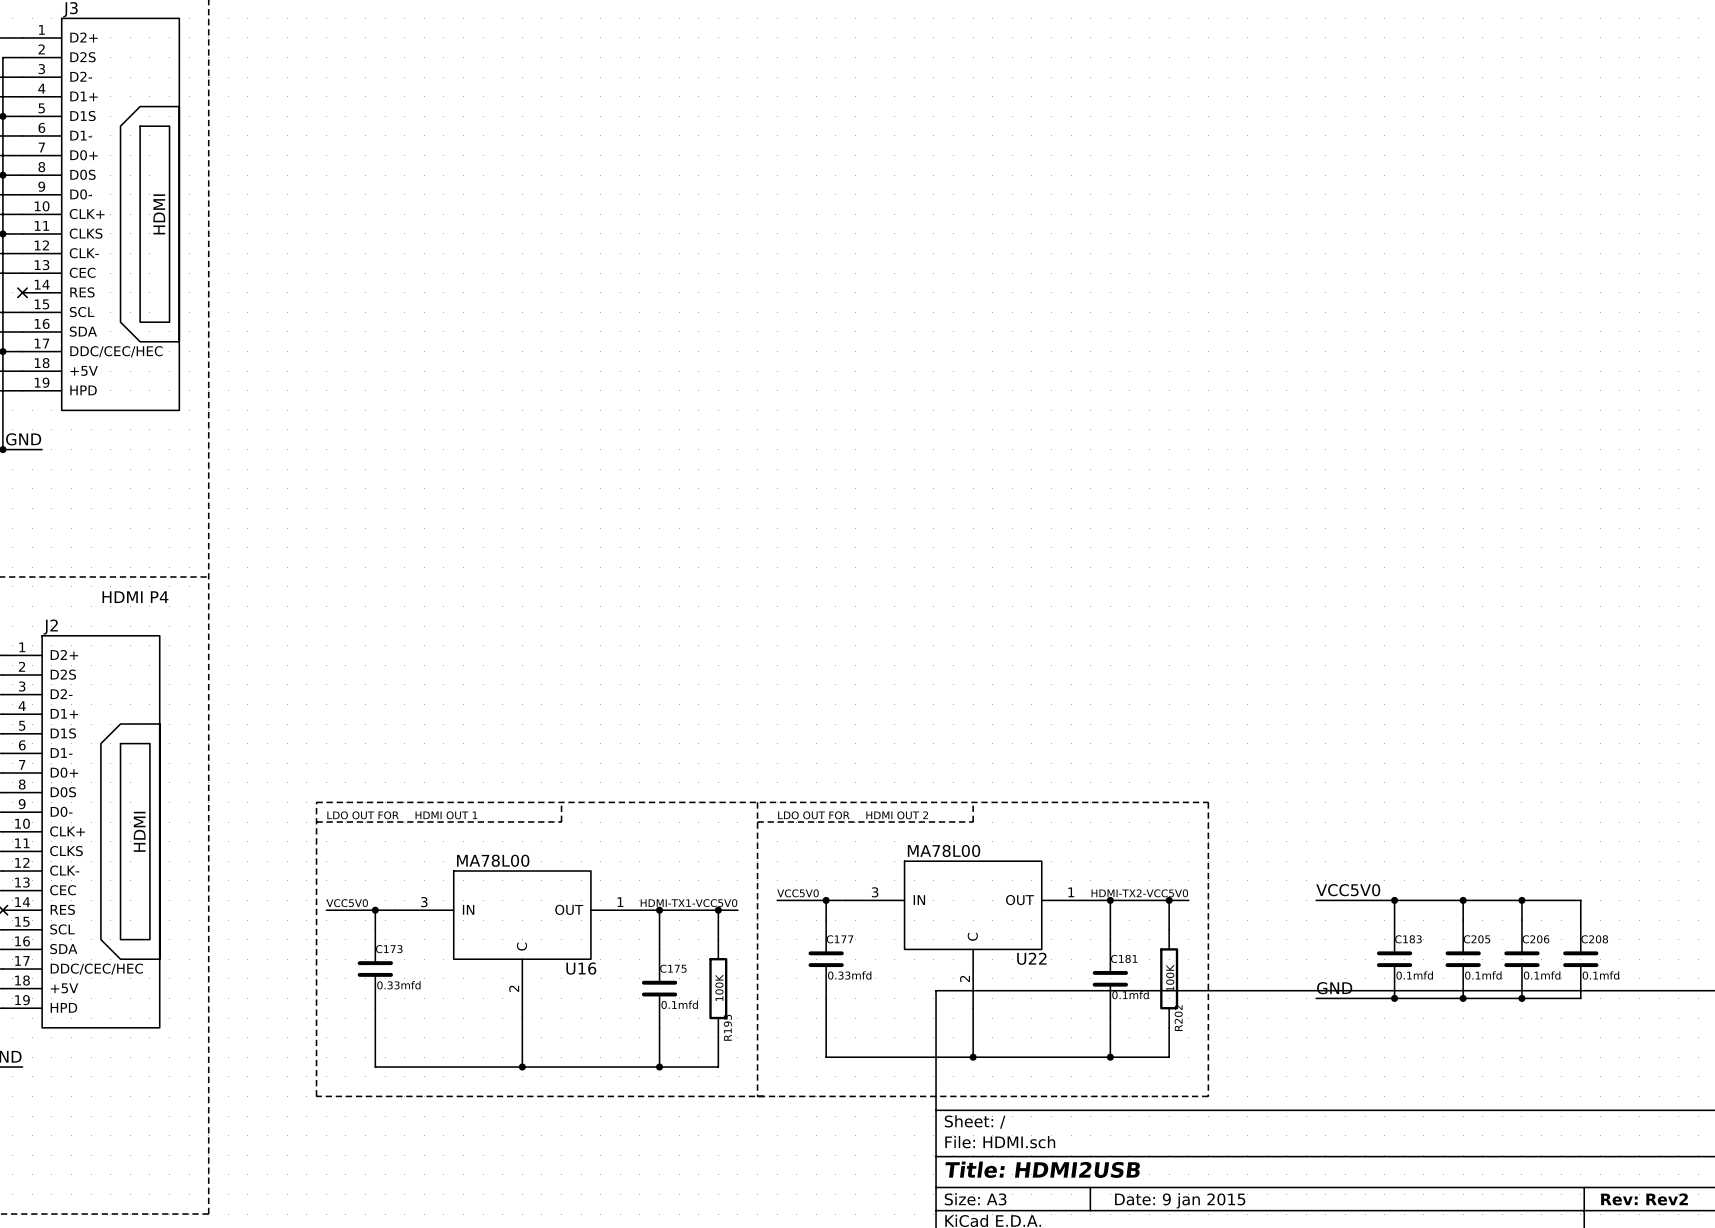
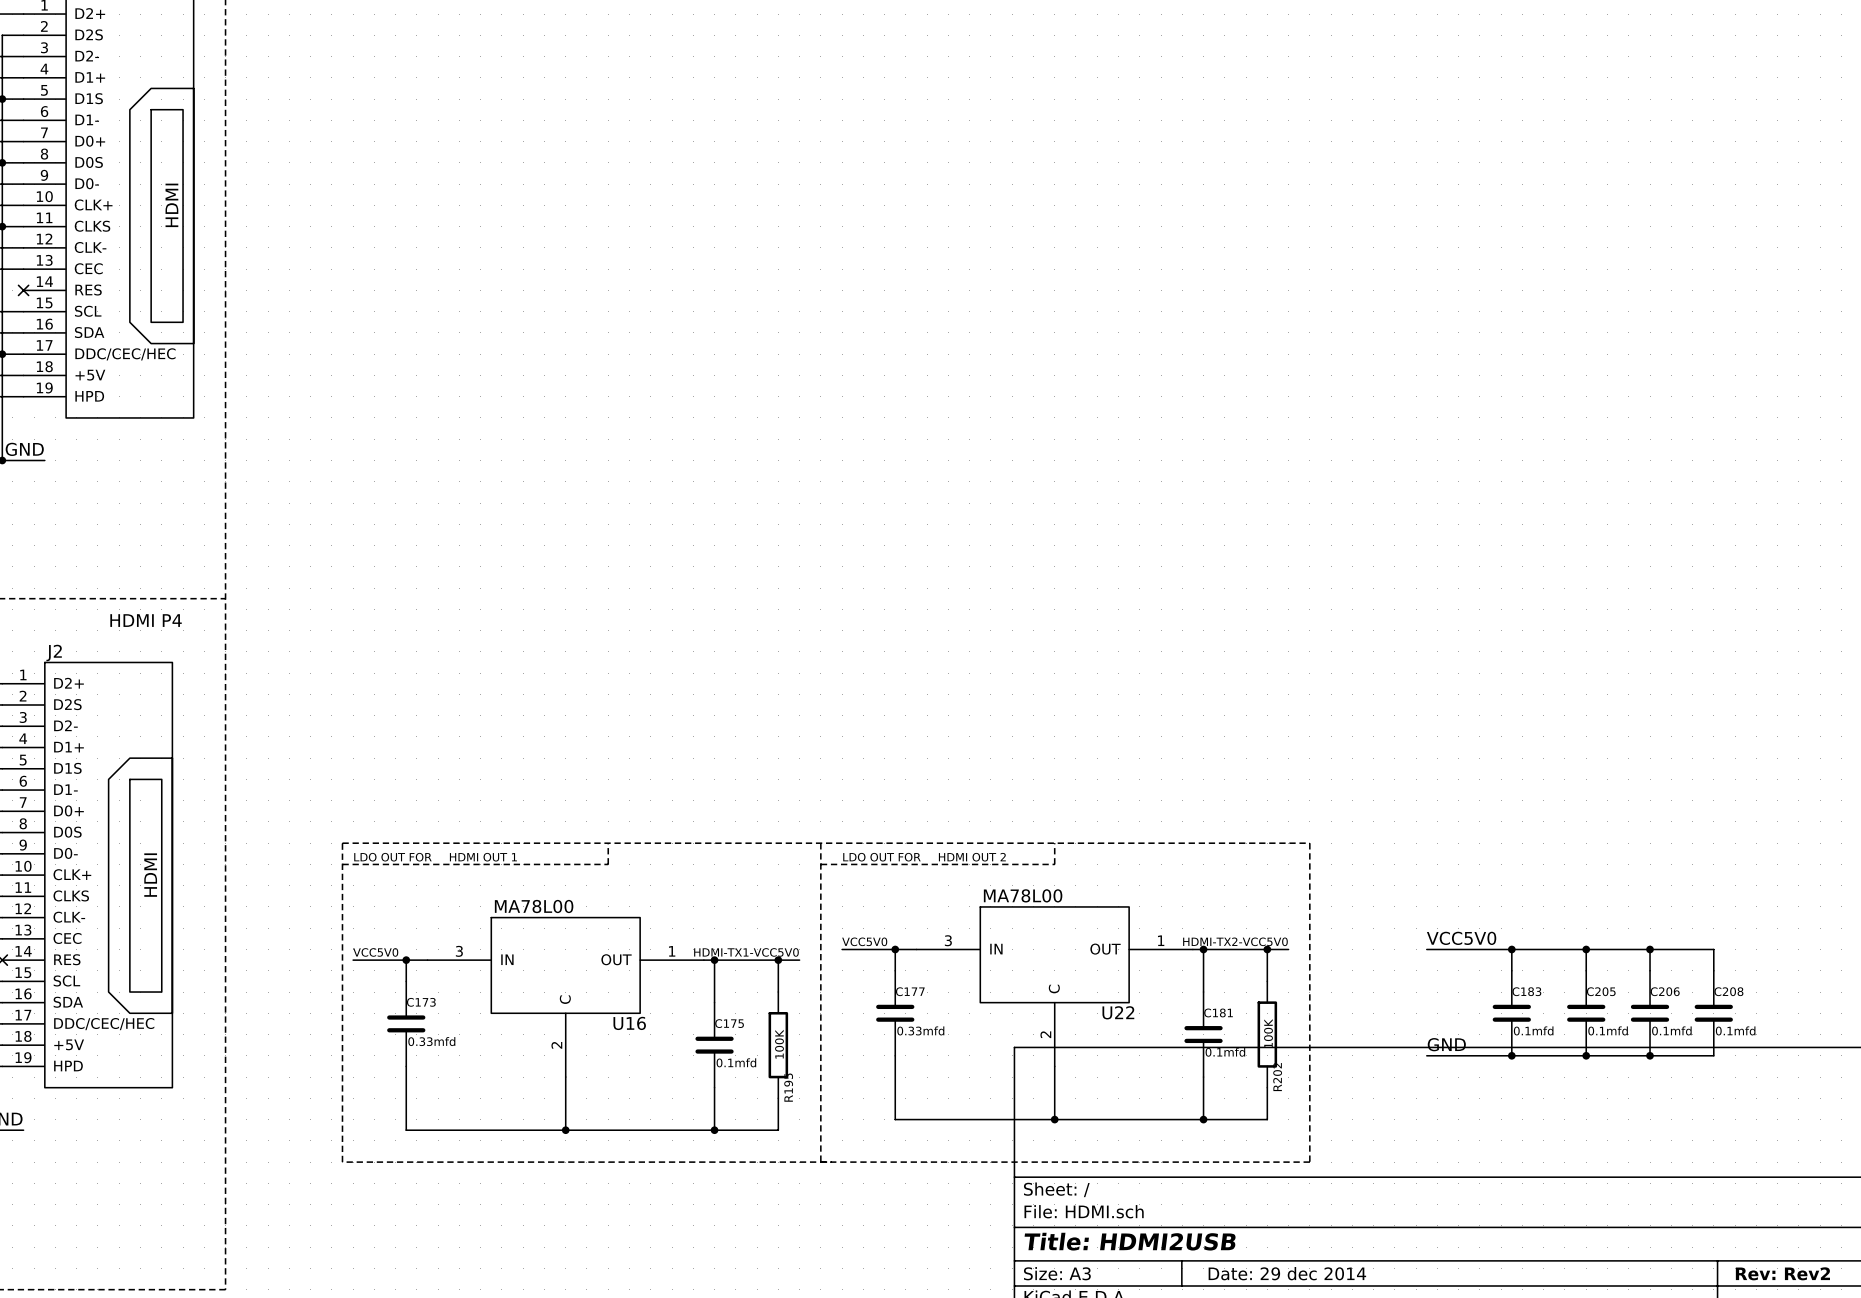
title block: Date: 9 jan 2015 (1180, 1200) -> Date: 29 dec 2014 (1287, 1273)

